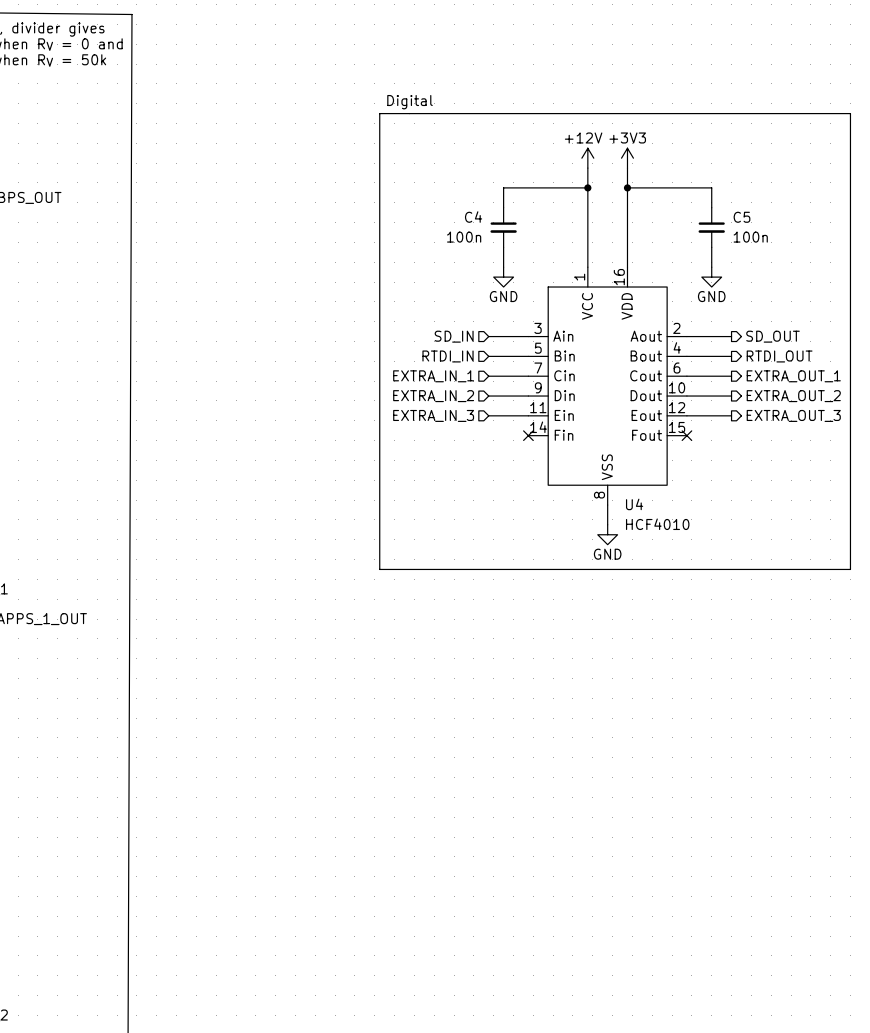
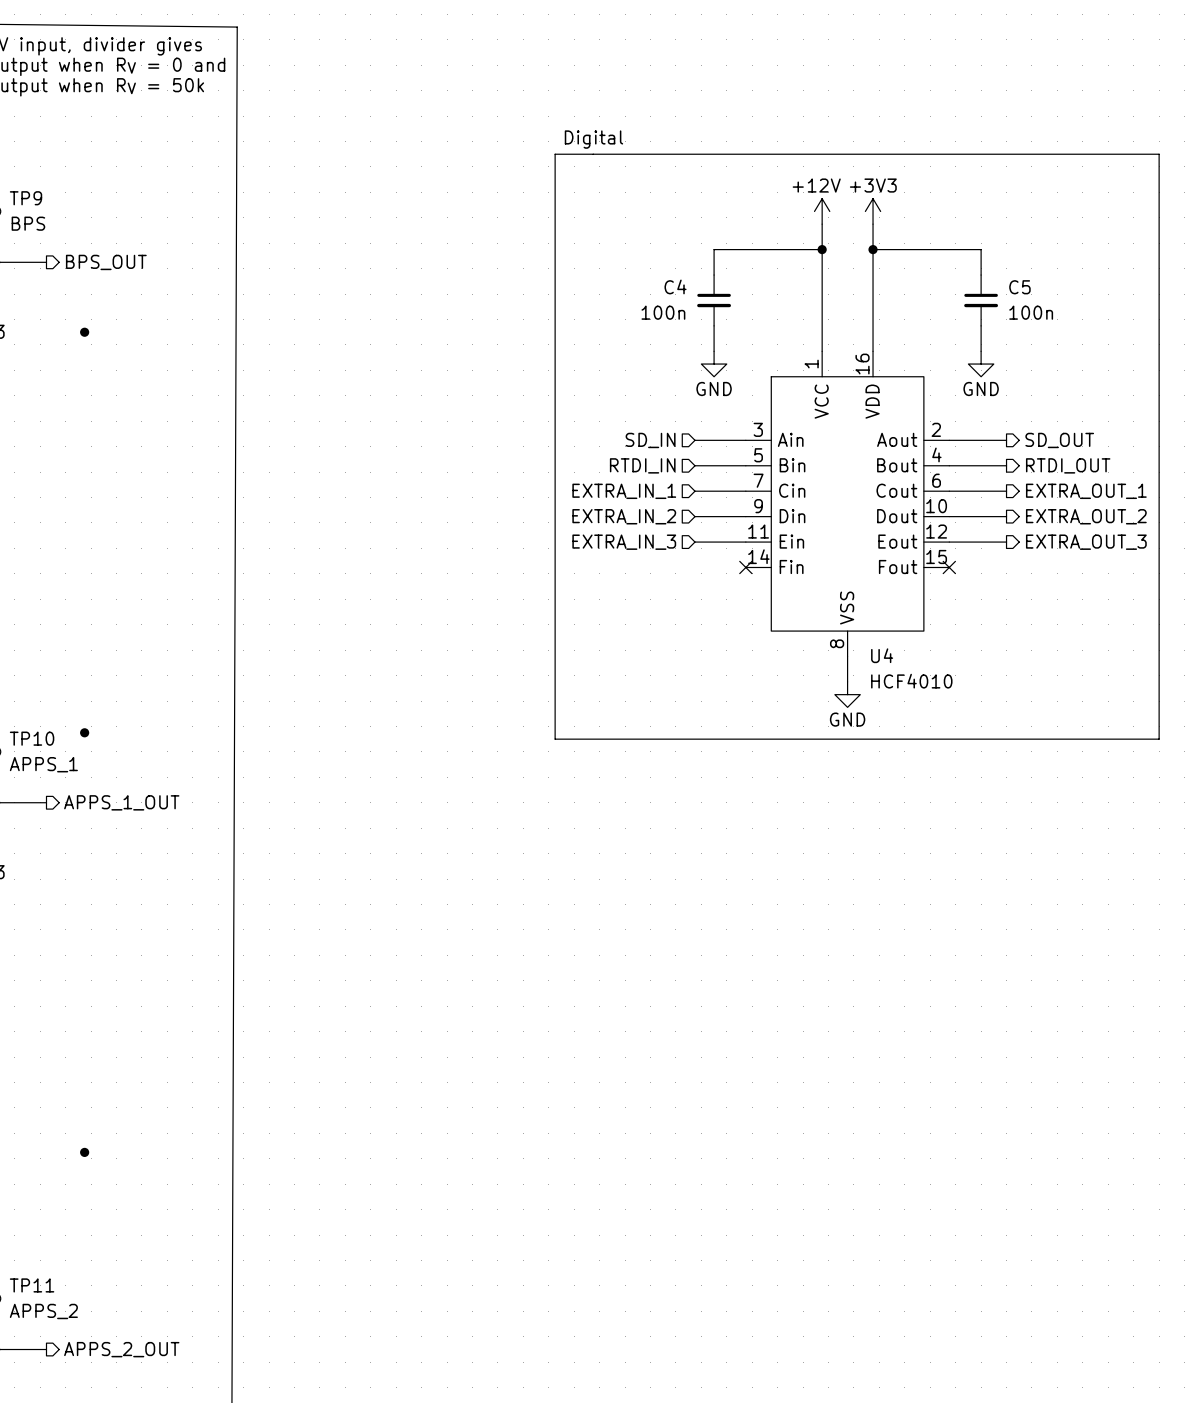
junction: none -> (84, 332)
junction: none -> (84, 732)
junction: none -> (84, 1152)

